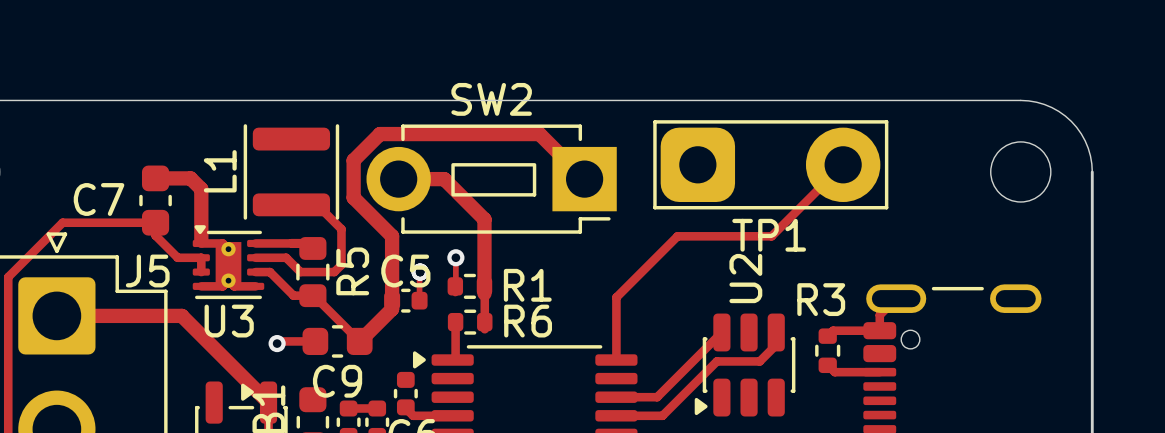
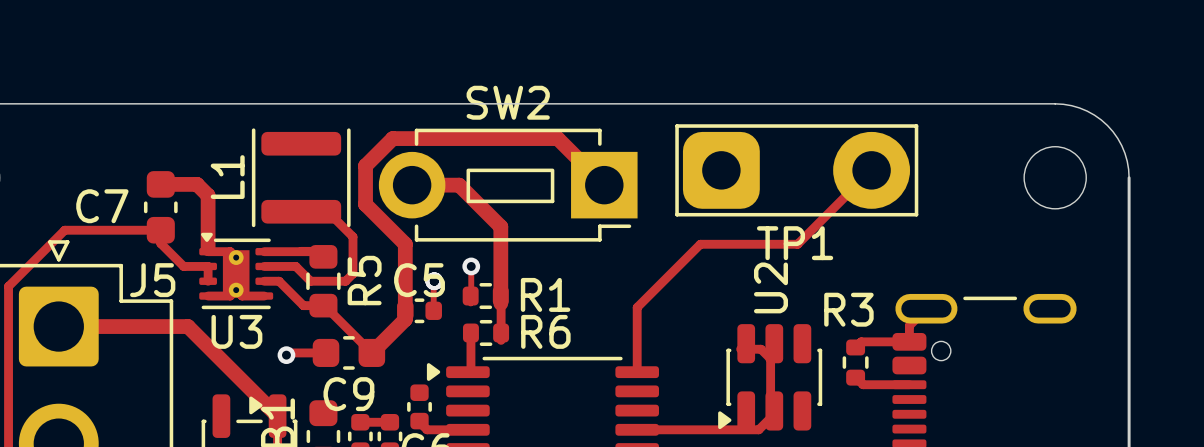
track: (721, 332) (657, 397) (616, 397) -> none
track: (776, 332) (776, 345) (759, 361) (716, 361) (662, 415) -> (740, 349) (761, 349) (770, 358) (770, 417) (758, 429) (684, 429)

